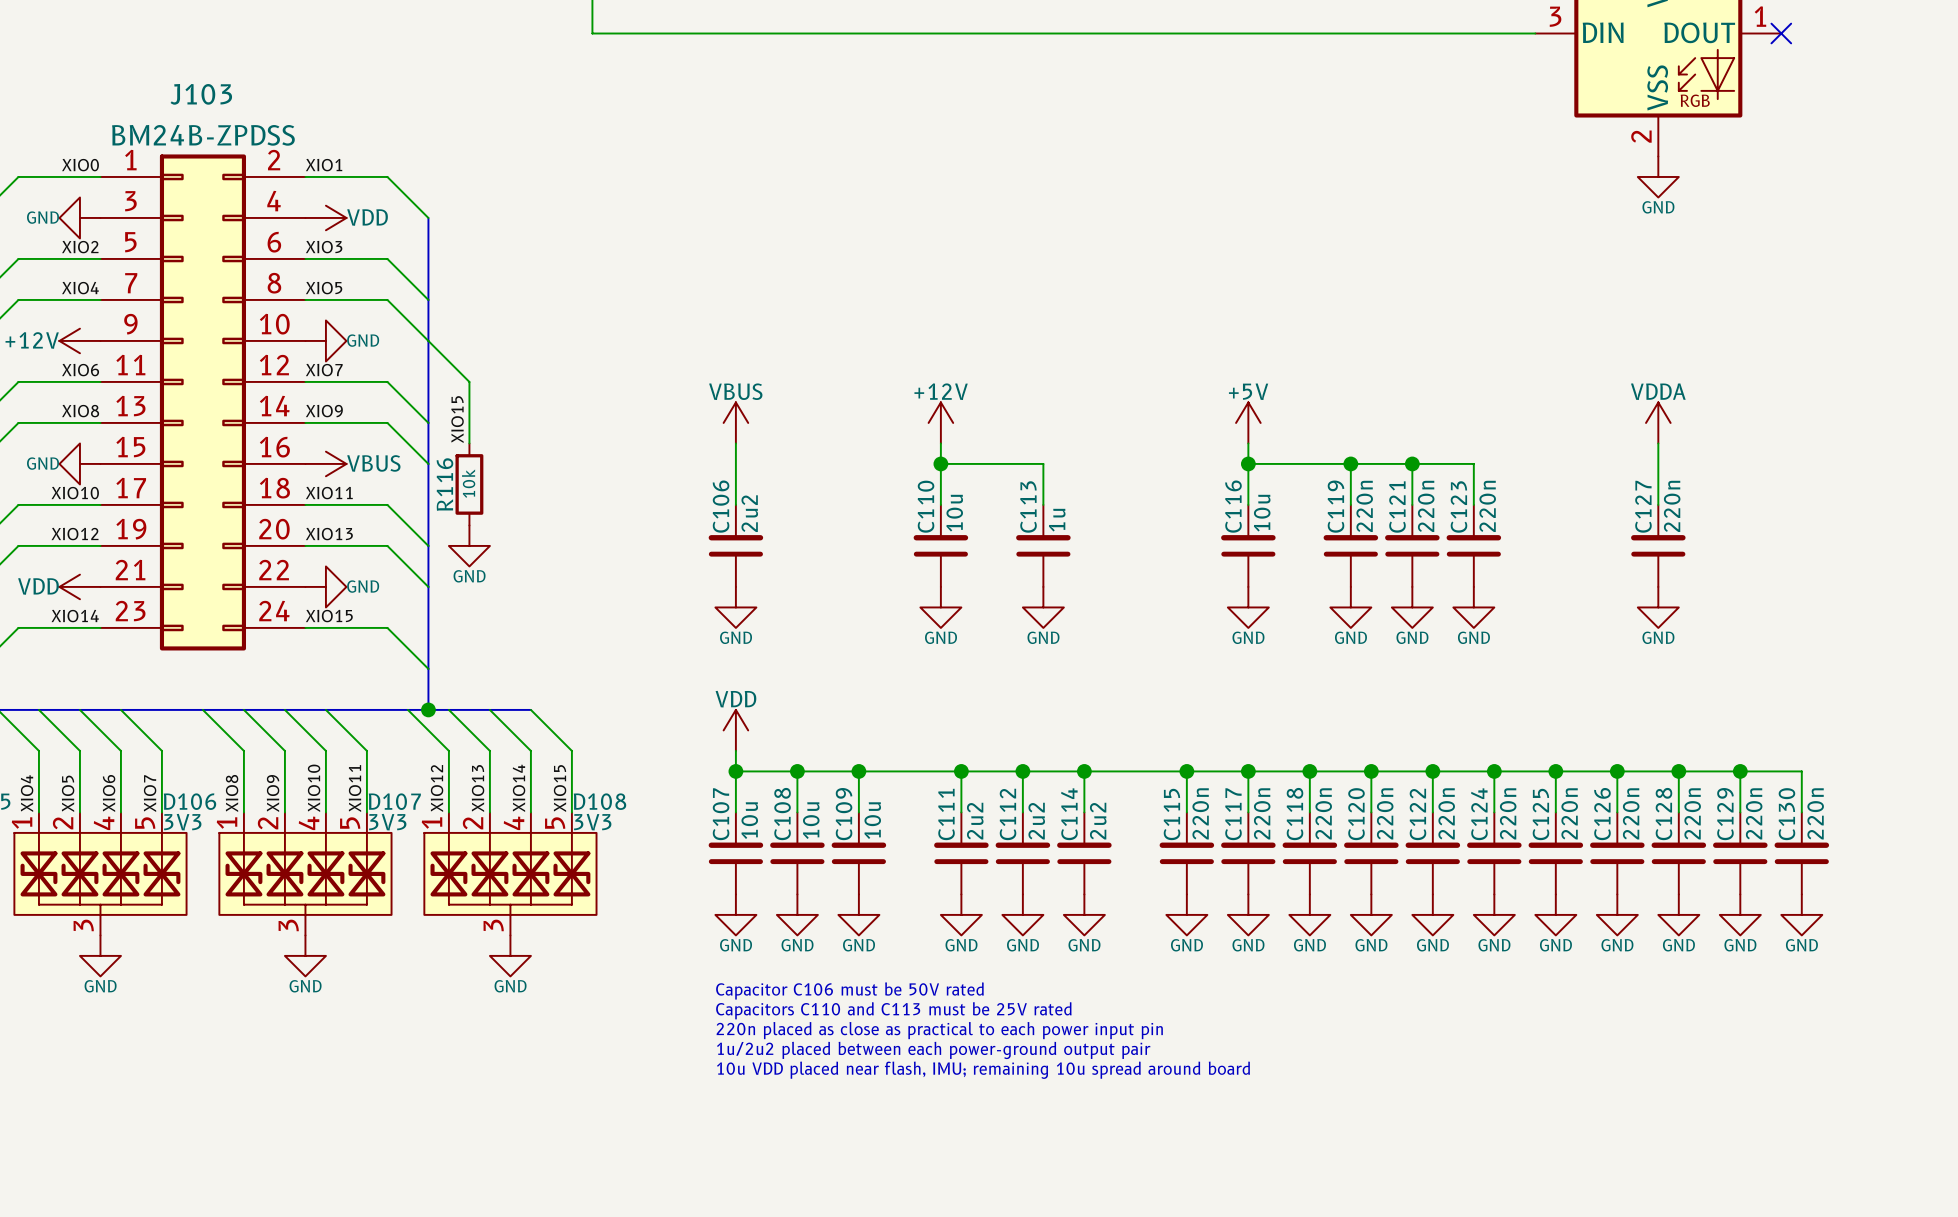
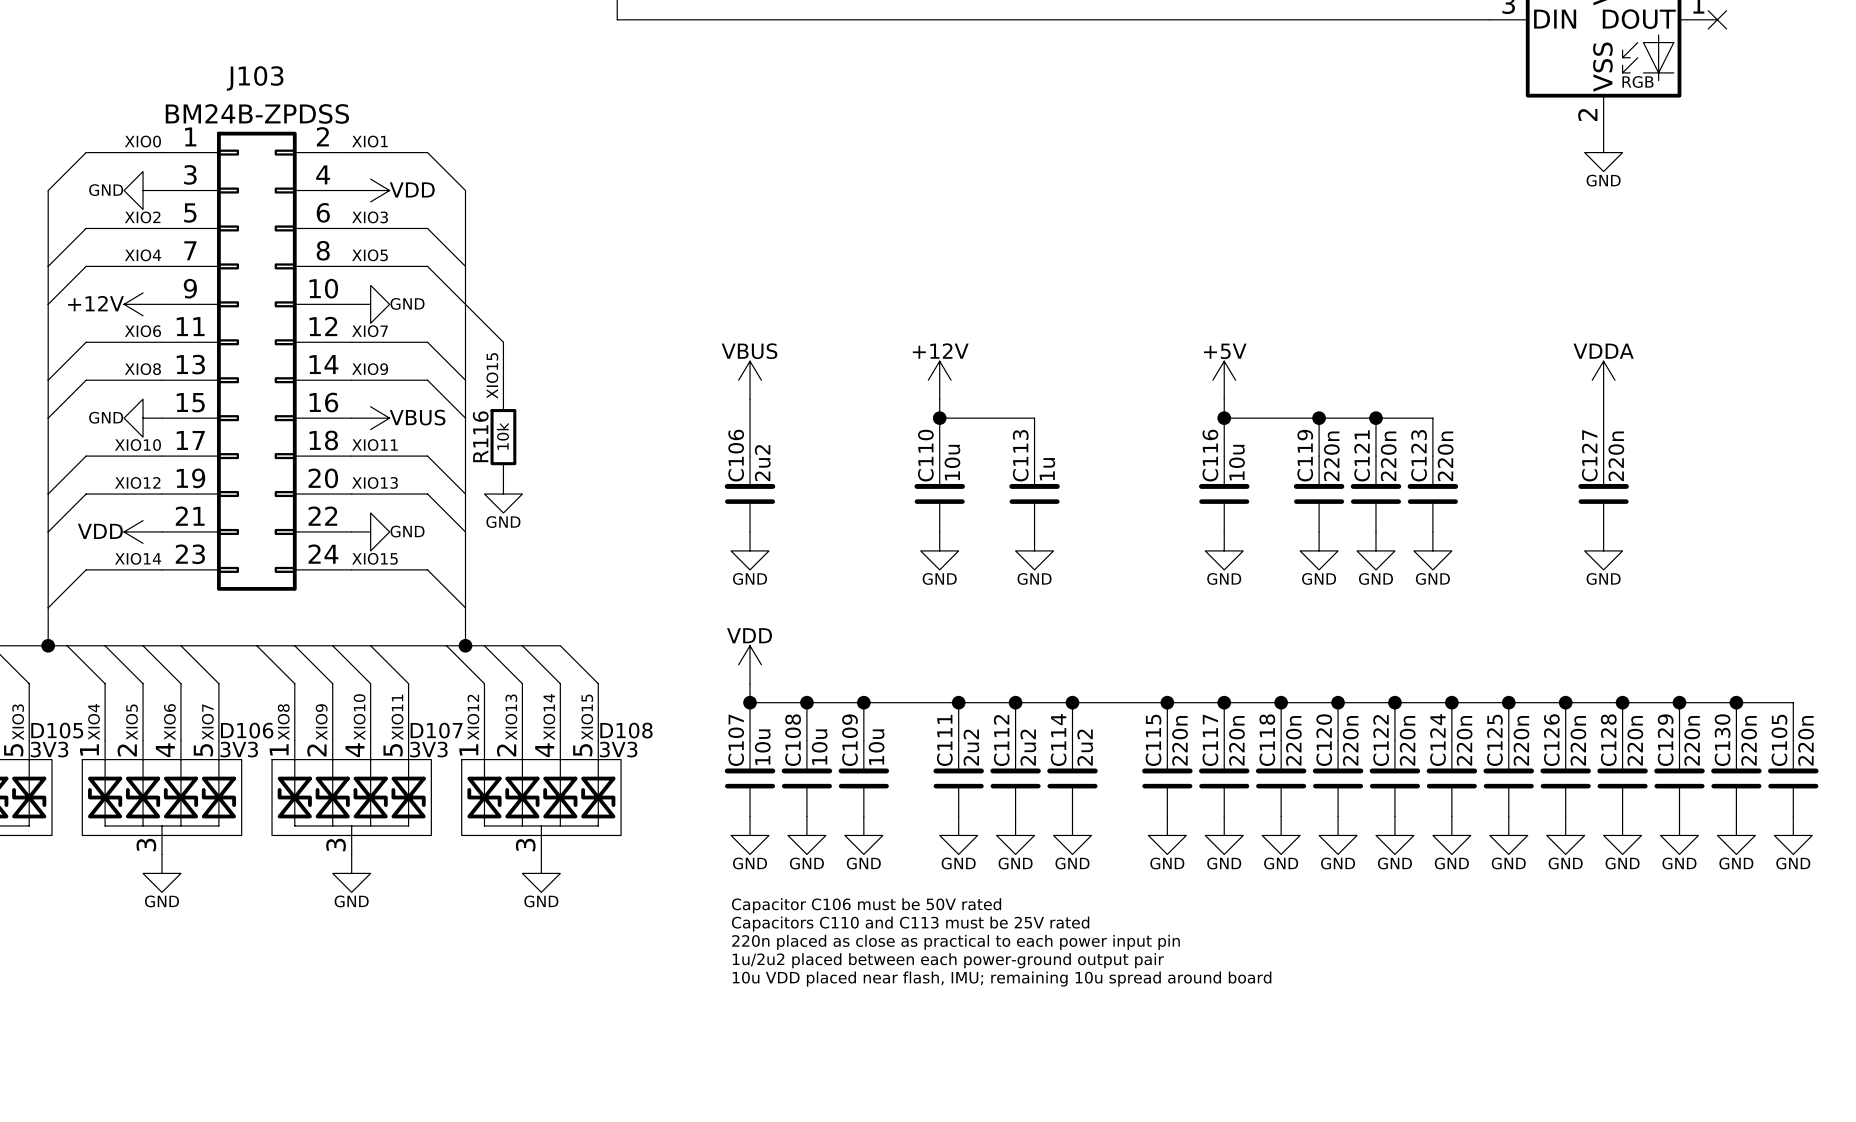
wire: none -> (1736, 702) (1793, 702) (1793, 740)
junction: none -> (1736, 702)
C105: none -> 220n (1793, 778)
power symbol: none -> GND (1793, 835)

